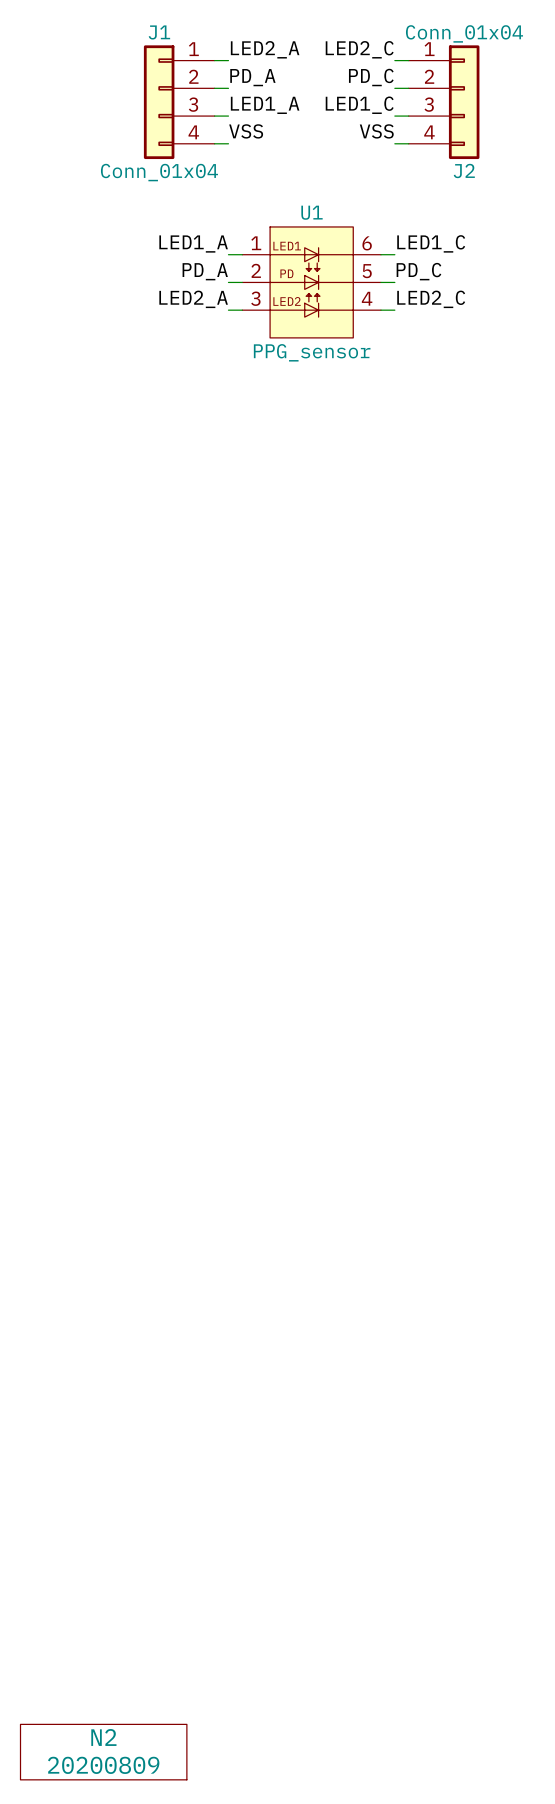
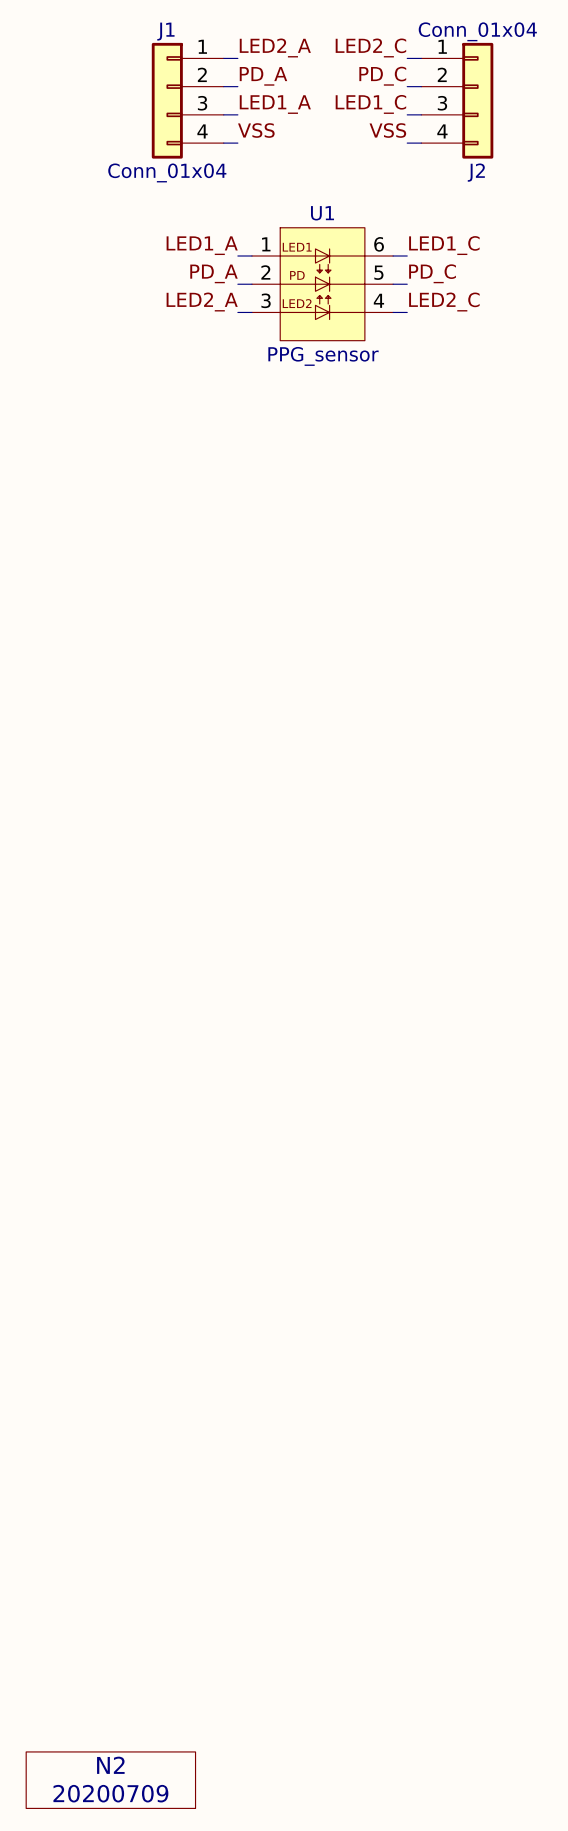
N2 value: 20200809 (103, 1765) -> 20200709 (110, 1793)

